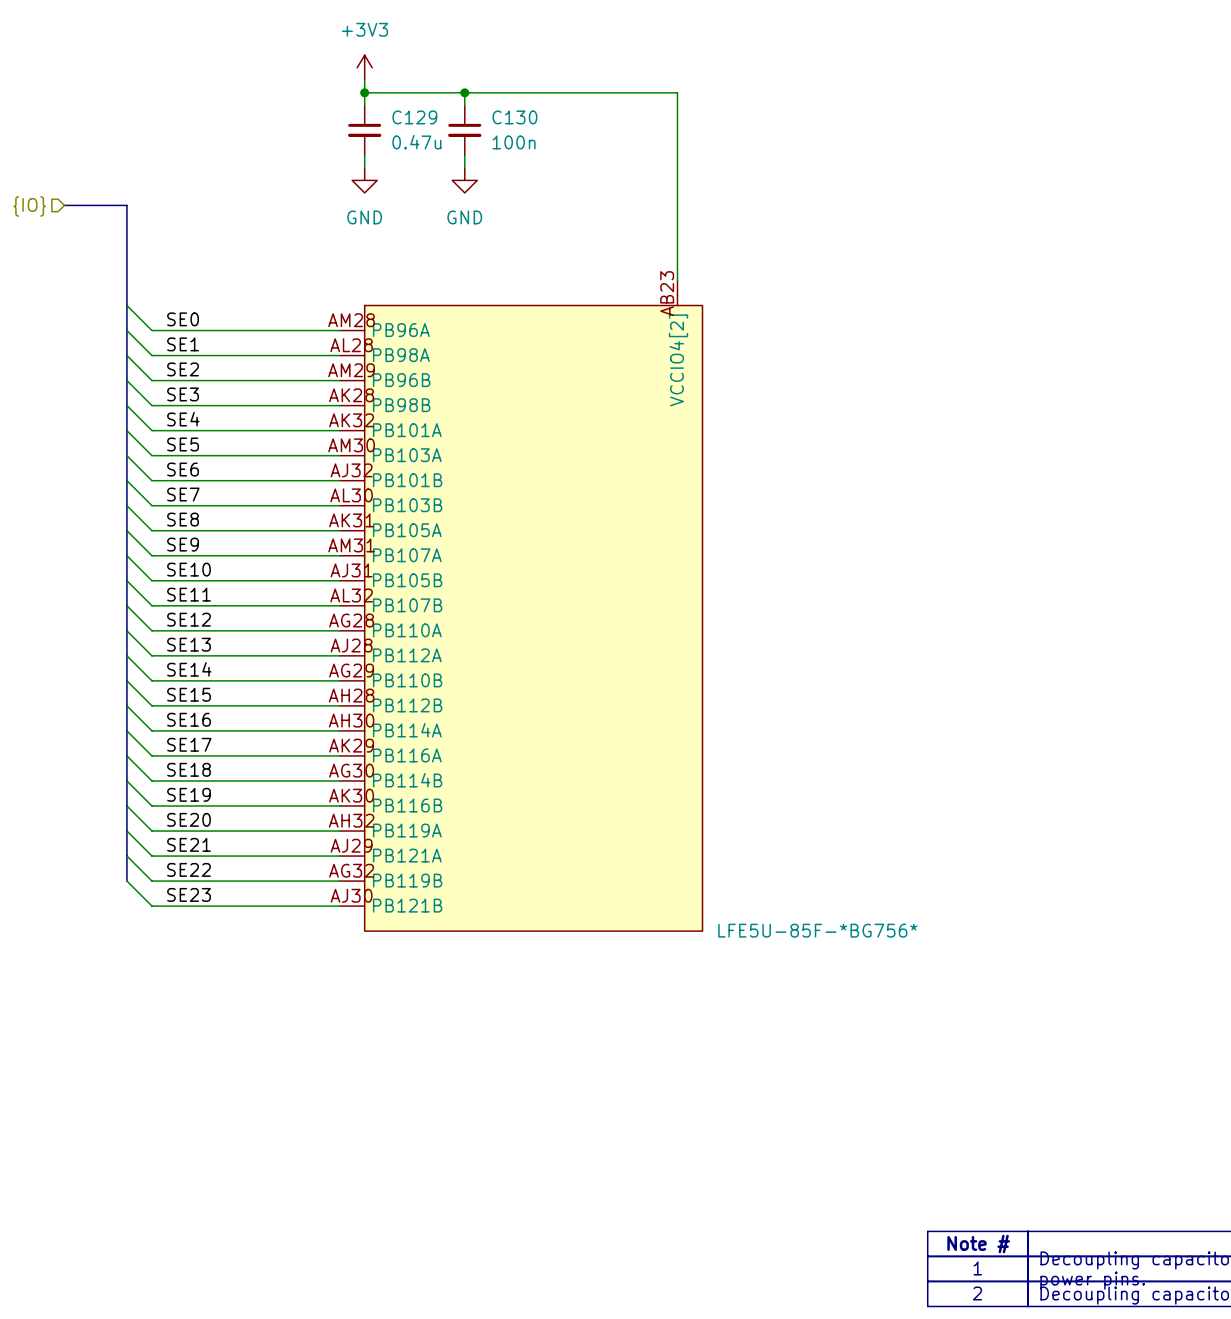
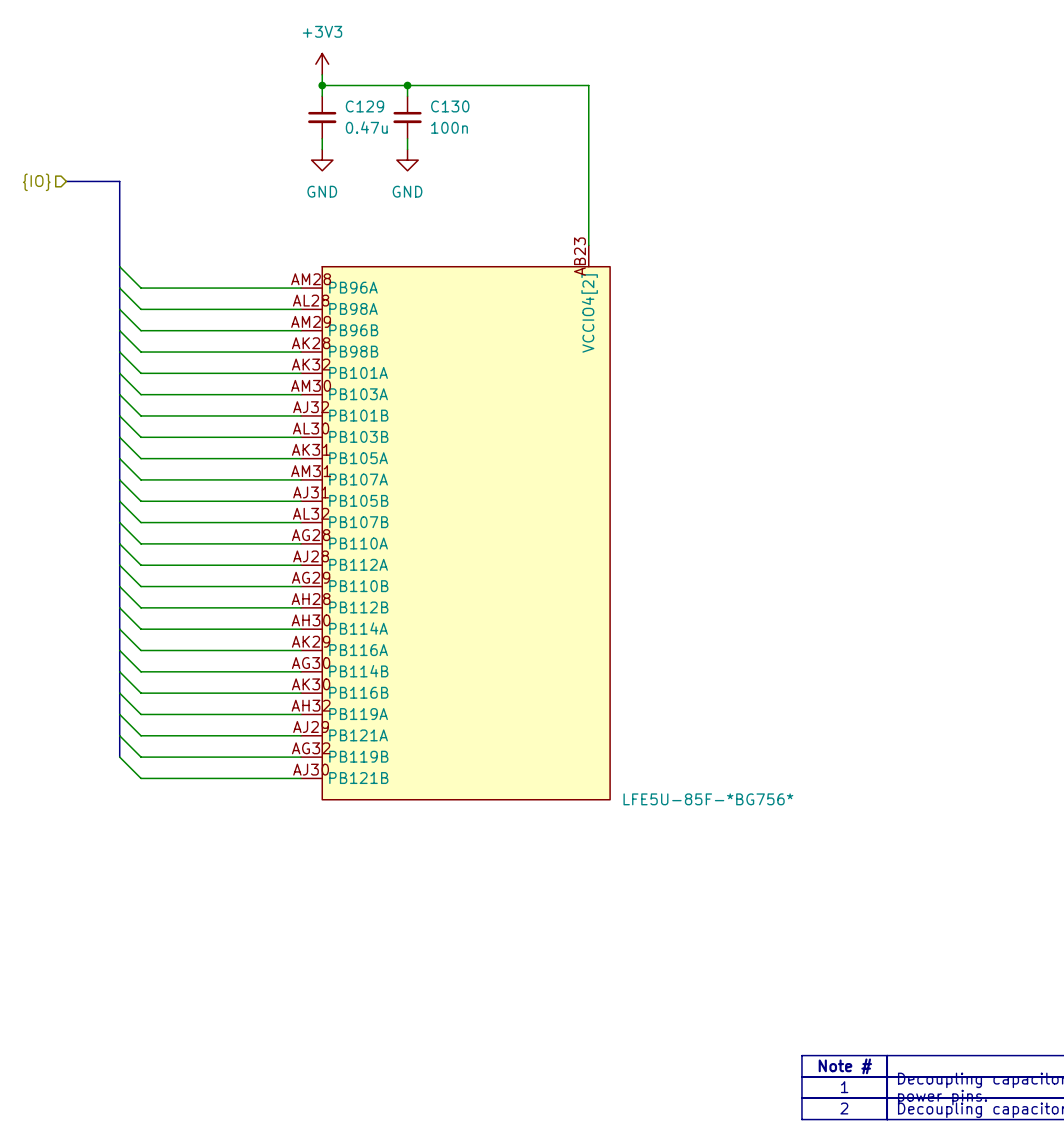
label: SE0 (183, 319) -> none
label: SE1 (183, 344) -> none
label: SE2 (183, 369) -> none
label: SE3 (183, 394) -> none
label: SE4 (183, 419) -> none
label: SE5 (183, 444) -> none
label: SE6 (183, 469) -> none
label: SE7 (183, 494) -> none
label: SE8 (183, 519) -> none
label: SE9 (183, 544) -> none
label: SE10 (189, 569) -> none
label: SE11 (189, 594) -> none
label: SE12 (189, 619) -> none
label: SE13 (189, 644) -> none
label: SE14 (189, 669) -> none
label: SE15 (189, 694) -> none
label: SE16 (189, 719) -> none
label: SE17 (189, 744) -> none
label: SE18 (189, 769) -> none
label: SE19 (189, 794) -> none
label: SE20 (189, 819) -> none
label: SE21 (189, 844) -> none
label: SE22 (189, 869) -> none
label: SE23 (189, 894) -> none

